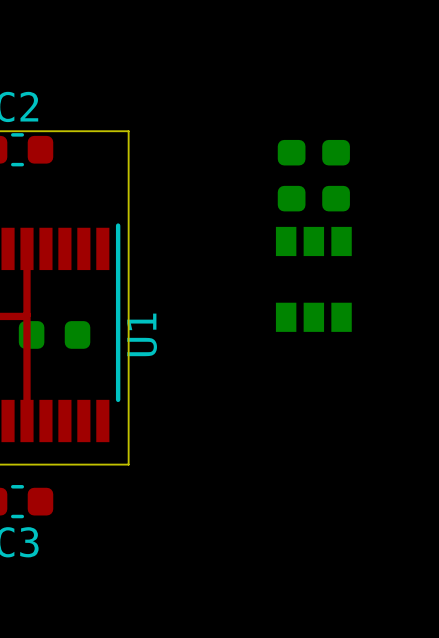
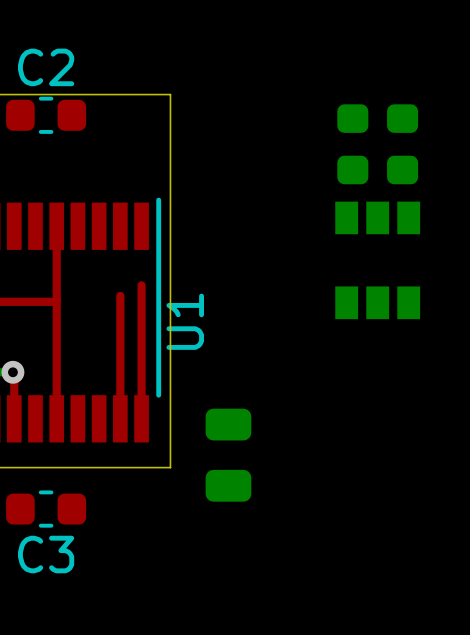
top track: none -> (141, 285) (141, 418)
top track: none -> (120, 295) (120, 418)
part: (54, 334) -> none
part: none -> (228, 455)

